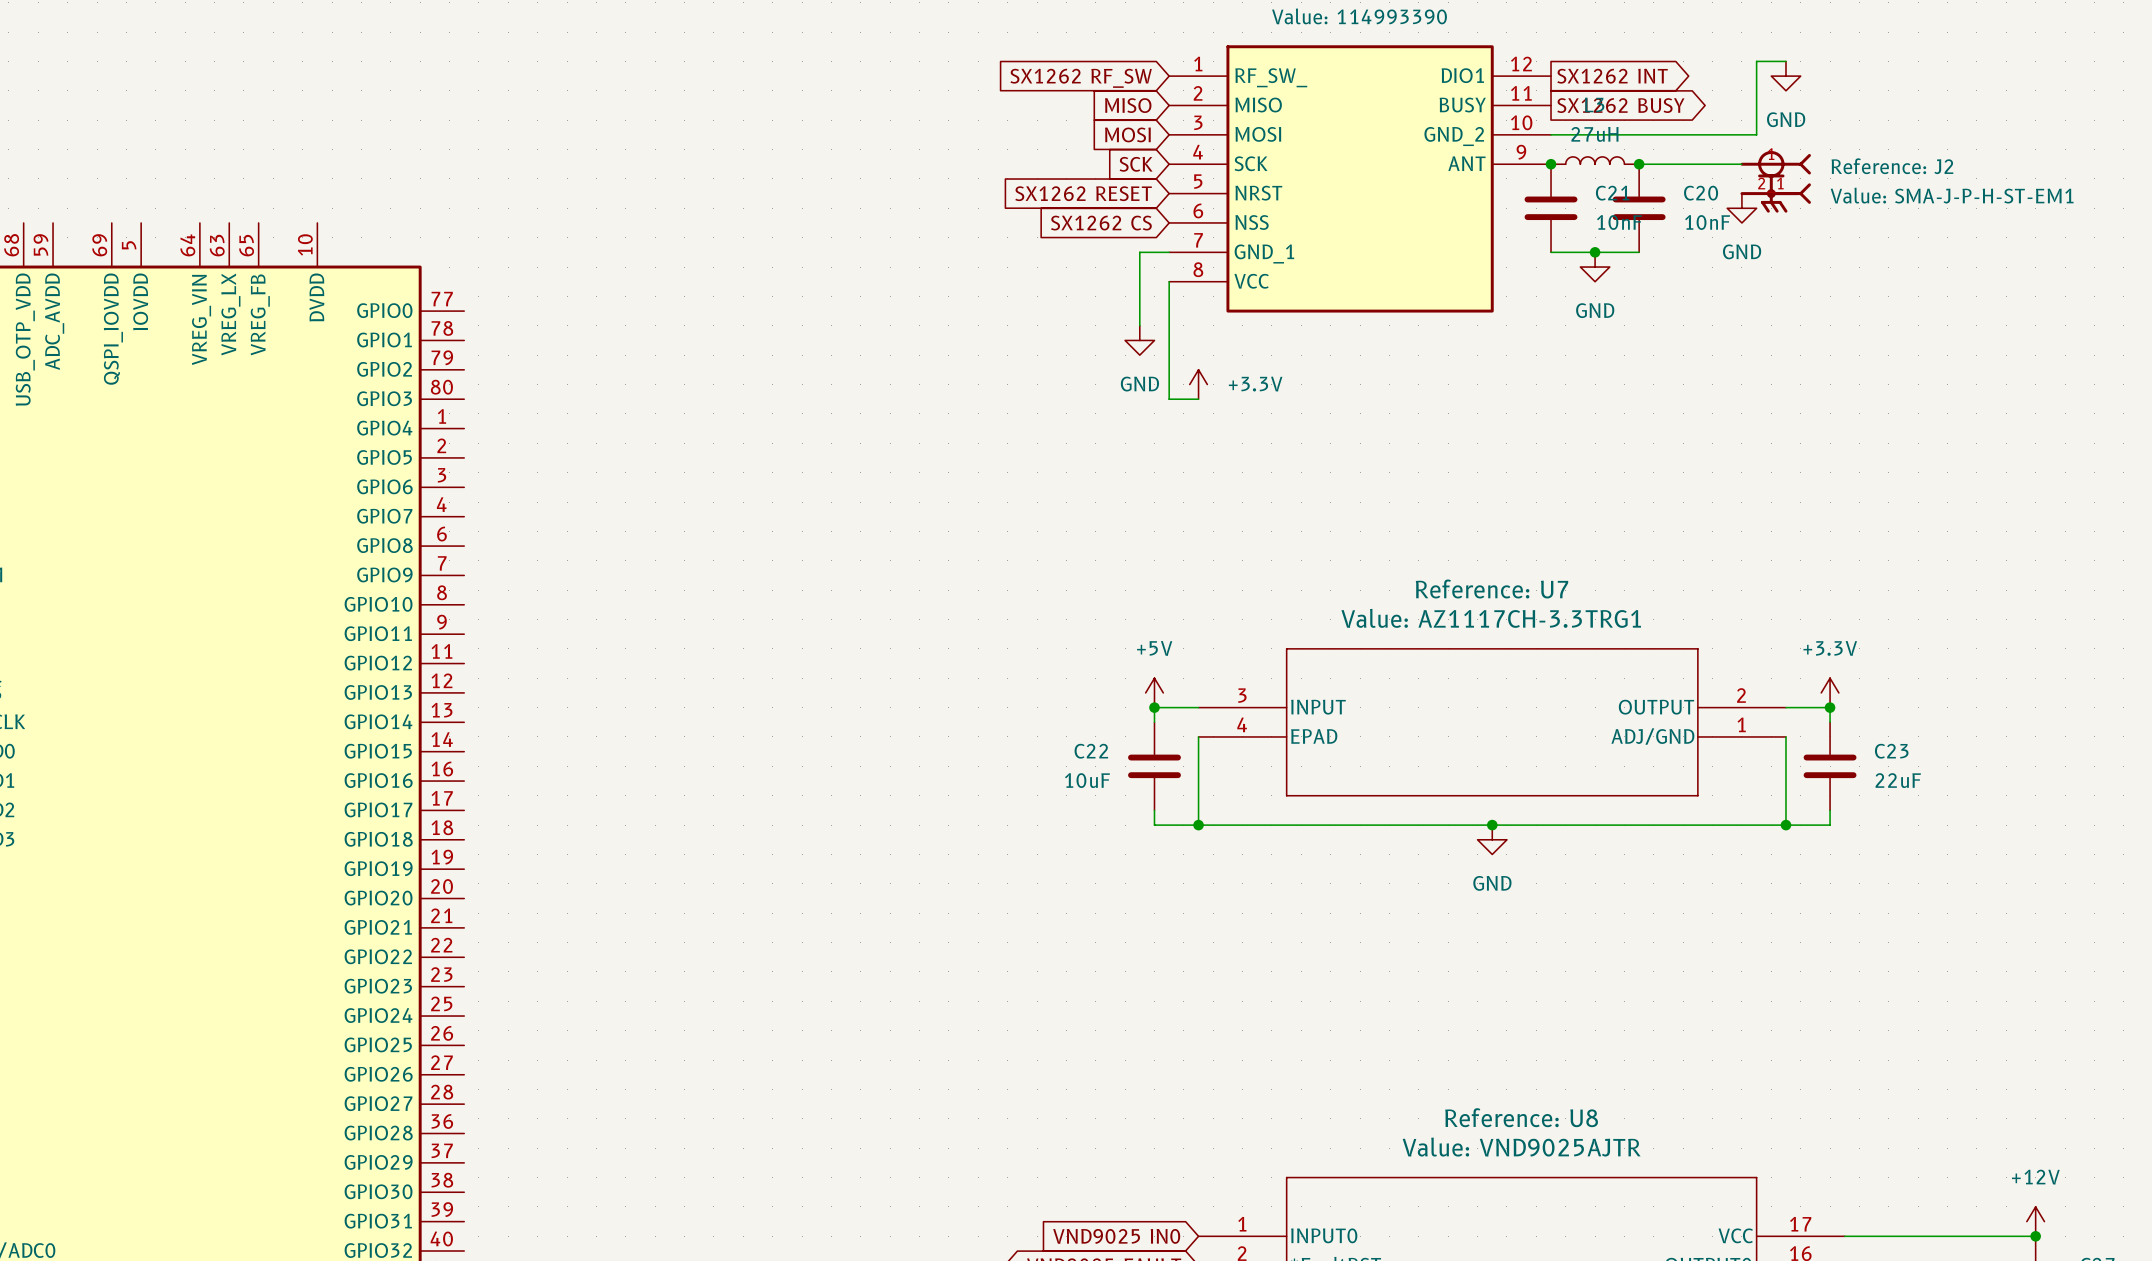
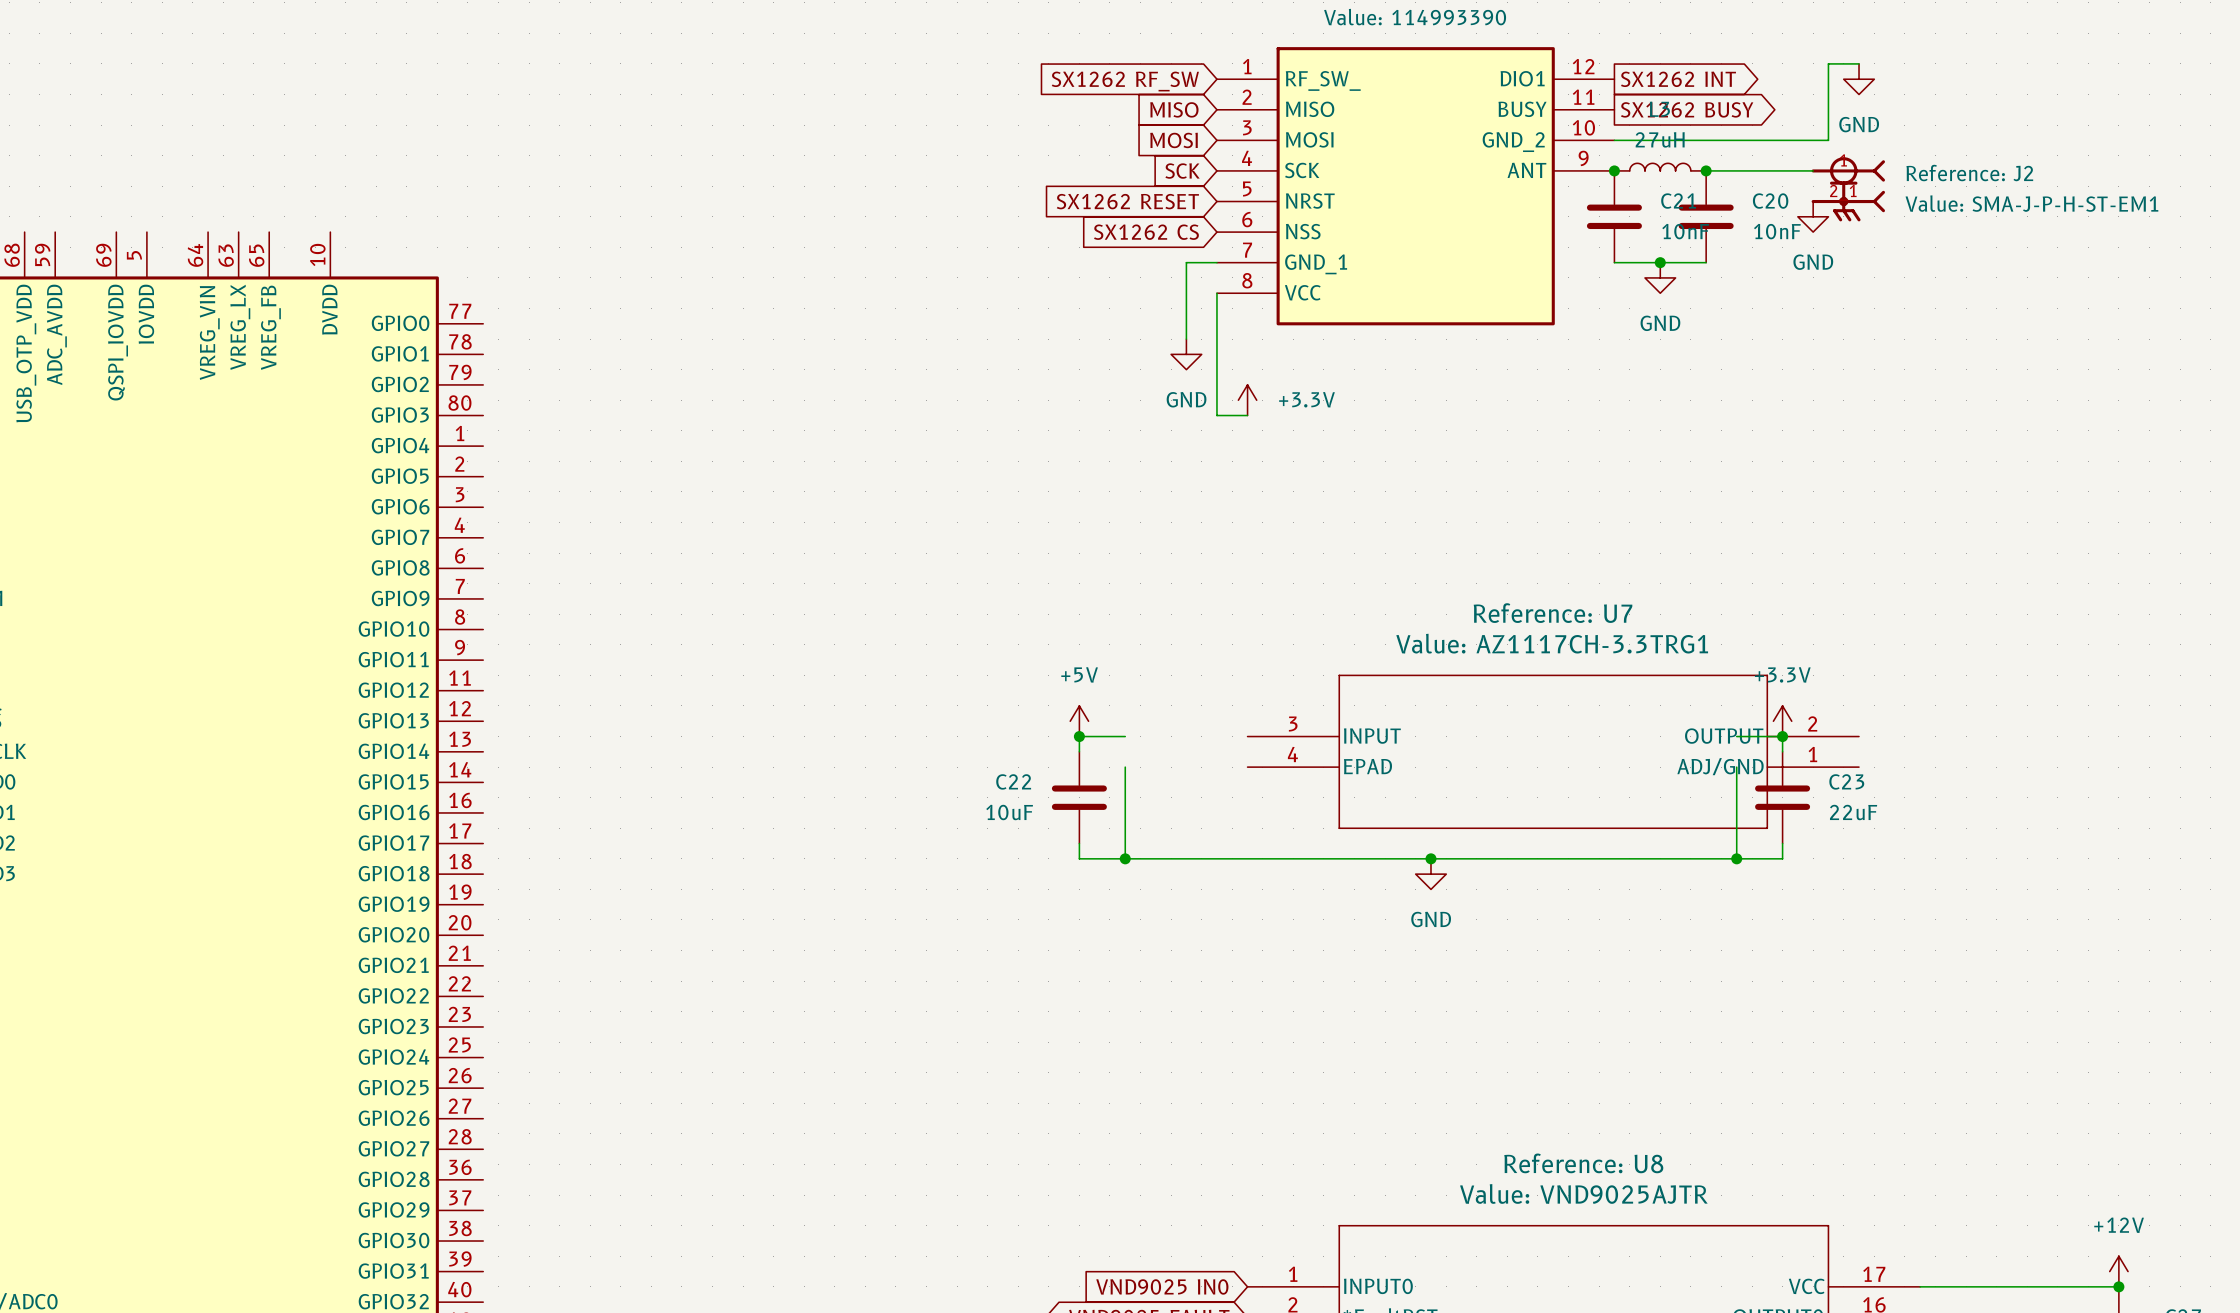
power symbol position: +5V (1154, 692) -> +5V (1079, 721)
power symbol position: +3.3V (1830, 692) -> +3.3V (1782, 721)
junction: none -> (1079, 736)
junction: (1154, 707) -> none
wire: (1198, 707) (1154, 707) (1154, 722) -> (1125, 736) (1079, 736) (1079, 751)
junction: none -> (1782, 736)
wire: (1785, 707) (1830, 707) (1830, 722) -> (1736, 736) (1782, 736) (1782, 751)
junction: (1830, 707) -> none
wire: (1198, 736) (1198, 825) -> (1125, 767) (1125, 858)
wire: (1785, 736) (1785, 825) -> (1736, 767) (1736, 858)
C22 position: (1154, 766) -> (1079, 797)
C23 position: (1830, 766) -> (1782, 797)
wire: (1154, 810) (1154, 825) -> (1079, 843) (1079, 858) (1201, 858)
wire: (1830, 810) (1830, 825) (1712, 825) -> (1782, 843) (1782, 858)
junction: none -> (1125, 858)
junction: (1198, 825) -> none
junction: none -> (1430, 858)
junction: (1492, 825) -> none
junction: none -> (1736, 858)
junction: (1785, 825) -> none
power symbol position: GND (1492, 839) -> GND (1430, 874)

